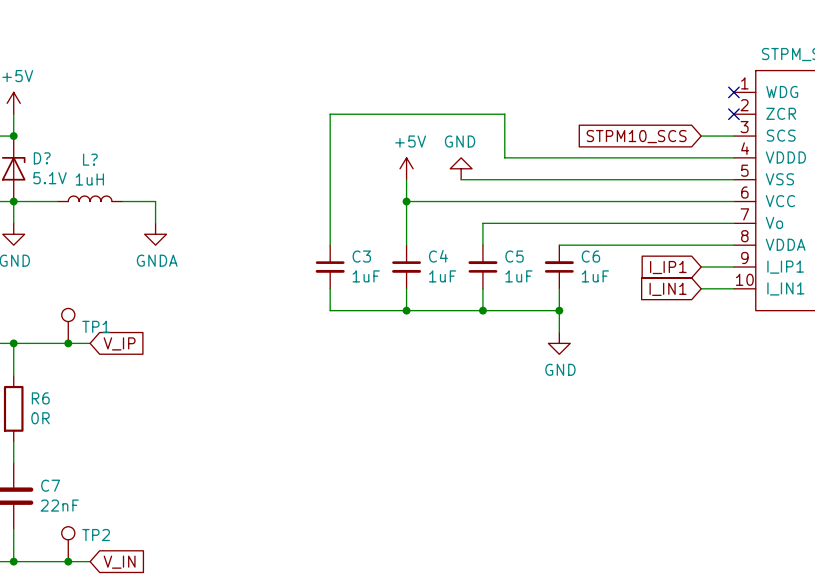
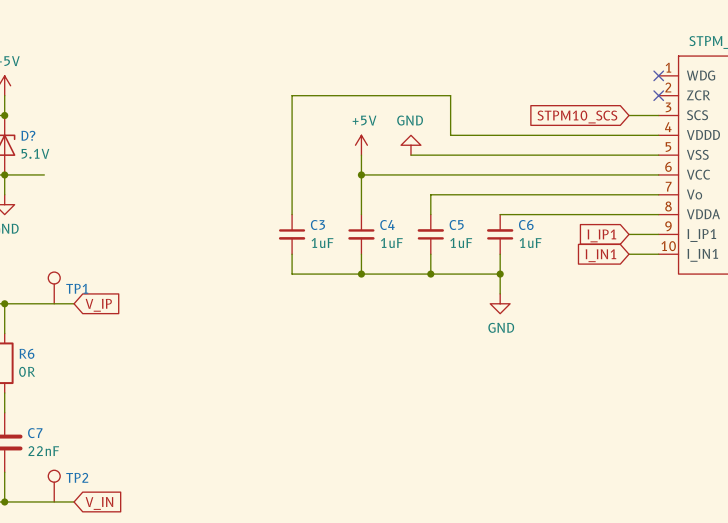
L?: 1uH (90, 198) -> none
wire: (122, 201) (155, 201) (155, 223) -> none
power symbol: GNDA (155, 234) -> none
junction: (68, 343) -> none
junction: (68, 561) -> none

